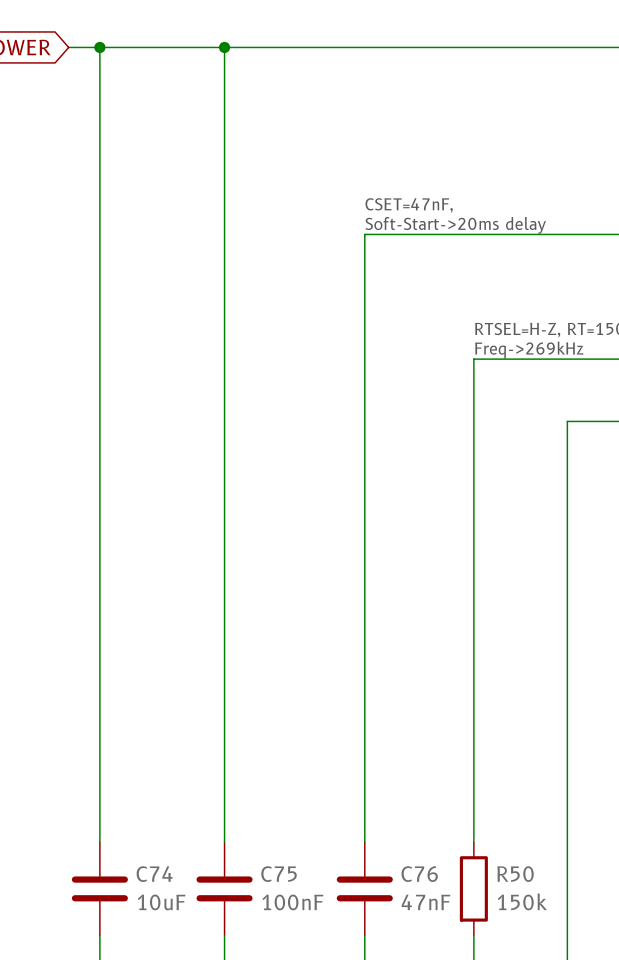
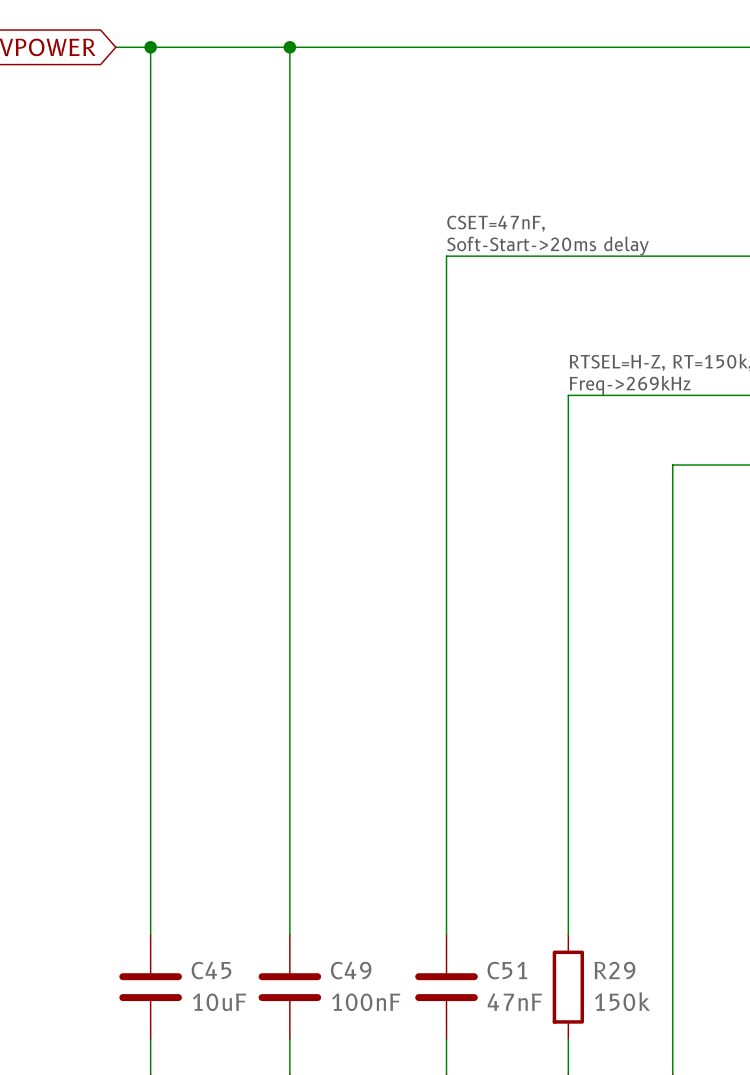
C74 name: C74 (154, 874) -> C45 (211, 970)
C75 name: C75 (279, 874) -> C49 (351, 970)
C76 name: C76 (419, 874) -> C51 (507, 970)
R50 name: R50 (515, 874) -> R29 (614, 970)

